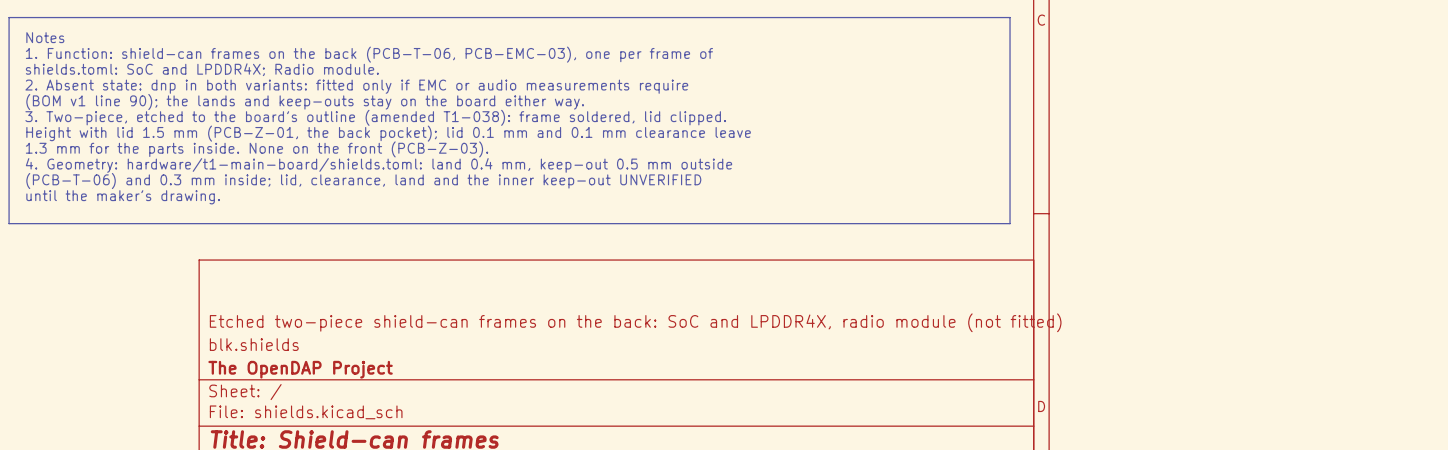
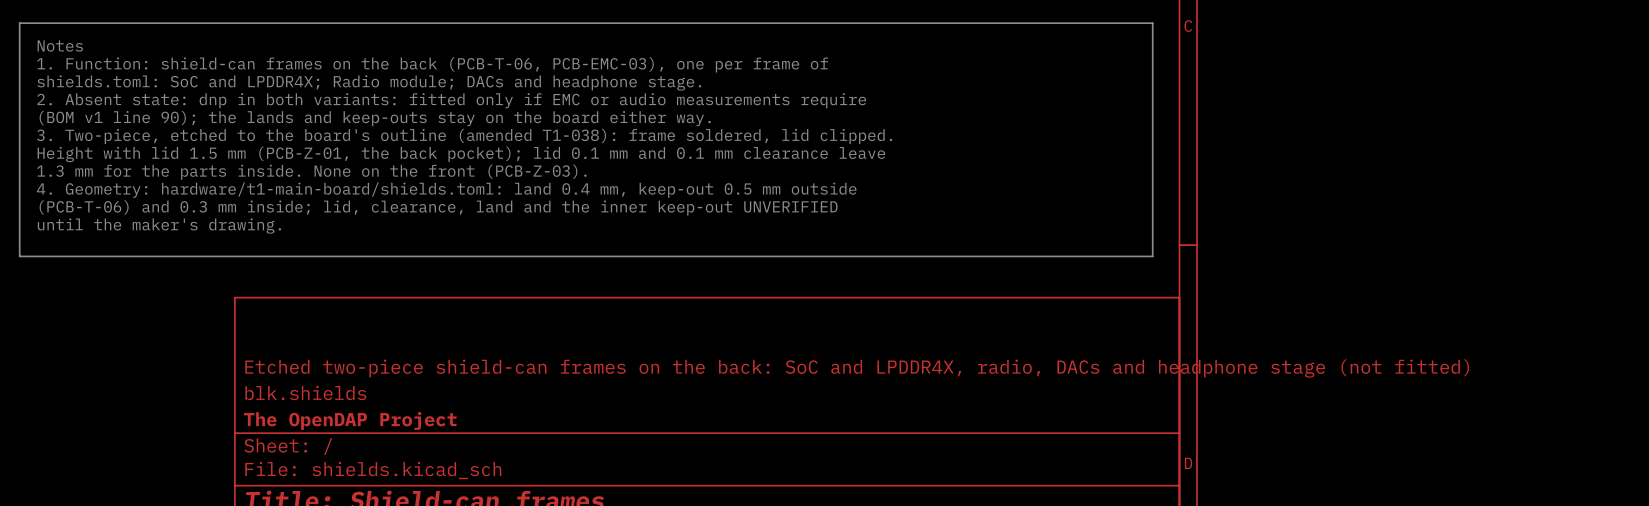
text: shields.toml: SoC and LPDDR4X; Radio module. (202, 69) -> shields.toml: SoC and LPDDR4X; Radio module; DACs and headphone stage. (369, 82)
title block: Etched two-piece shield-can frames on the back: SoC and LPDDR4X, radio module (not fitted) (635, 322) -> Etched two-piece shield-can frames on the back: SoC and LPDDR4X, radio, DACs and headphone stage (not fitted) (857, 368)

